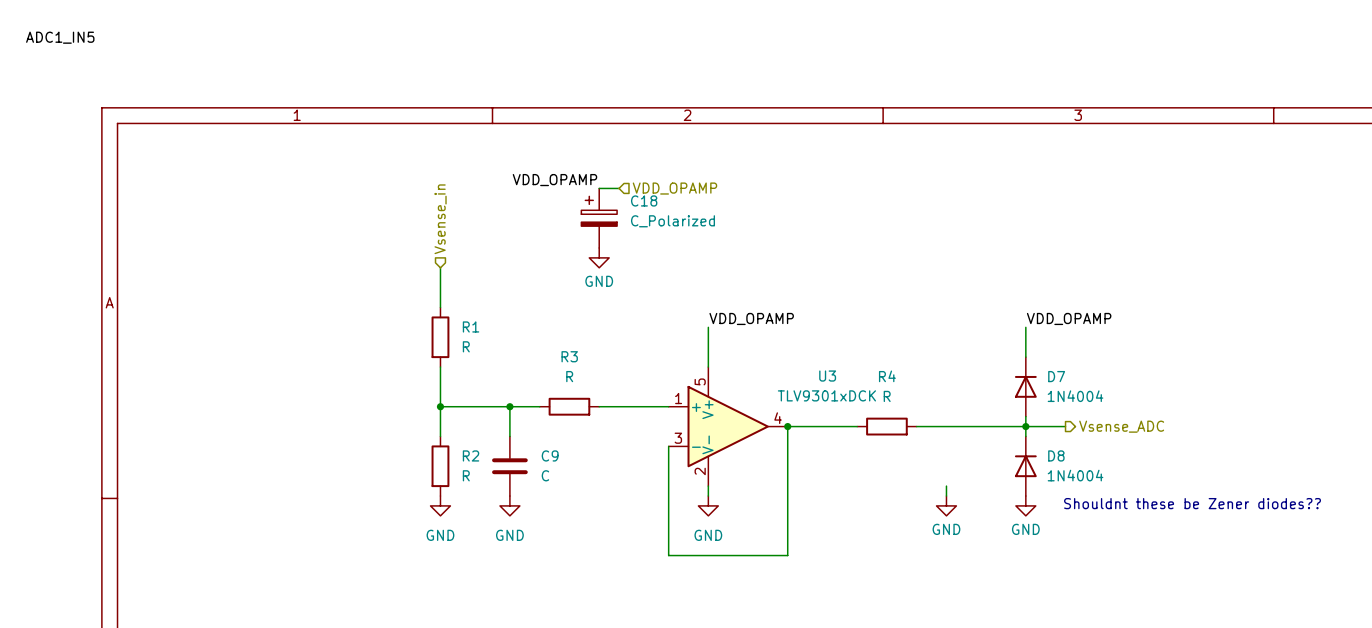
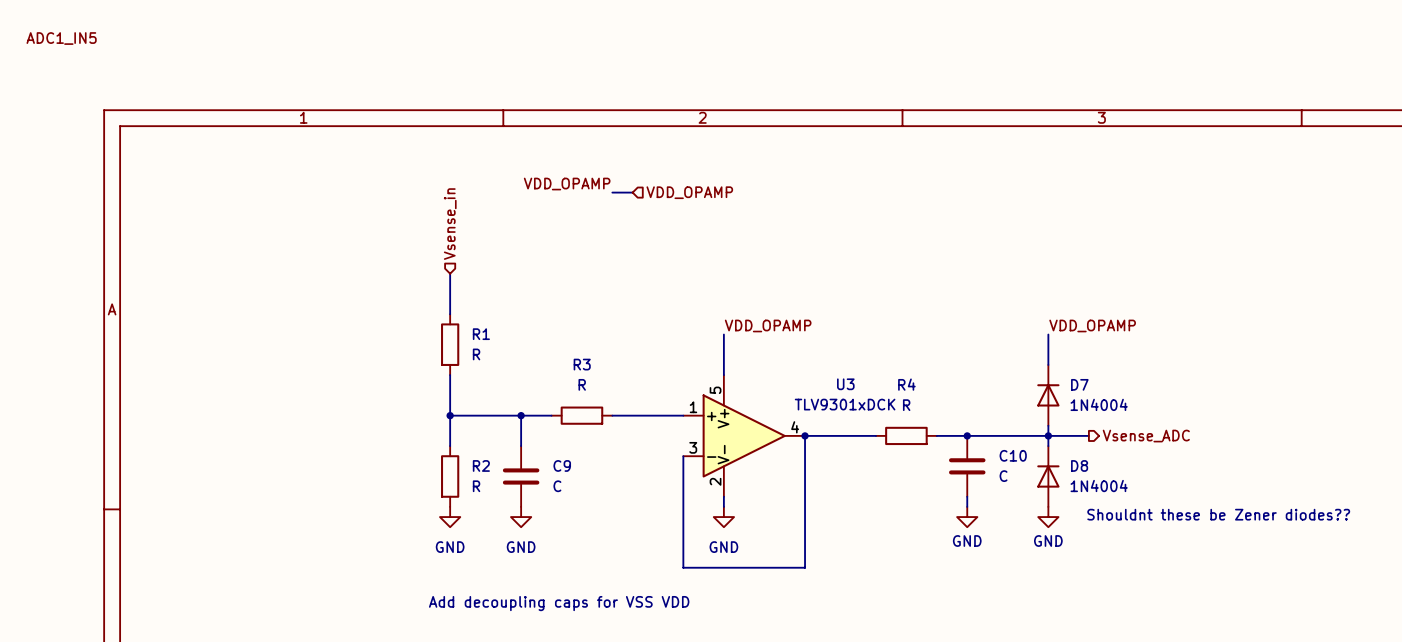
C18: C_Polarized (599, 218) -> none
power symbol: GND (599, 257) -> none
junction: none -> (967, 435)
C10: none -> C (967, 466)
text: none -> Add decoupling caps for VSS VDD (559, 603)

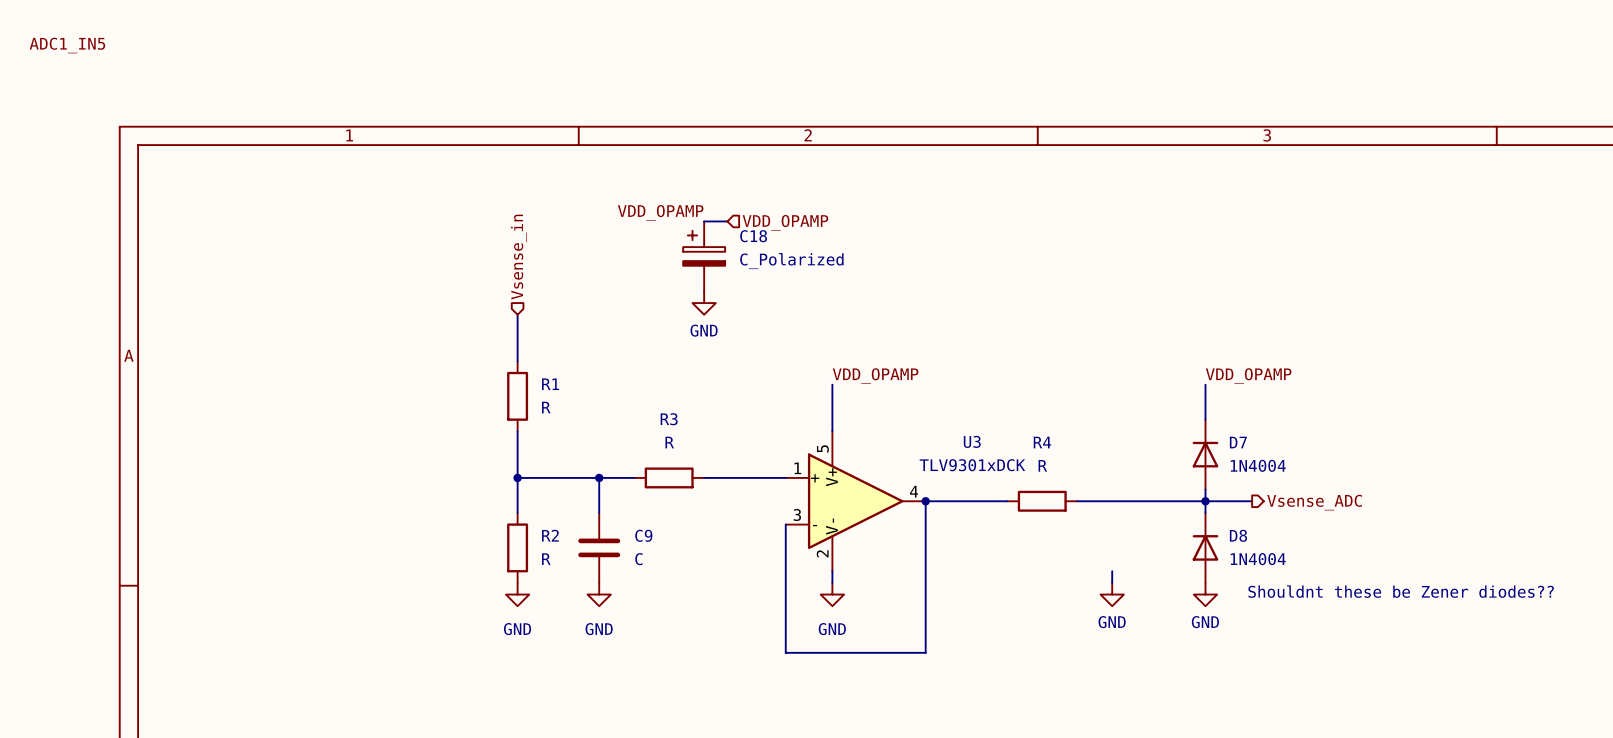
C18: none -> C_Polarized (704, 256)
power symbol: none -> GND (704, 303)
junction: (967, 435) -> none
C10: C (967, 466) -> none
text: Add decoupling caps for VSS VDD (559, 603) -> none

